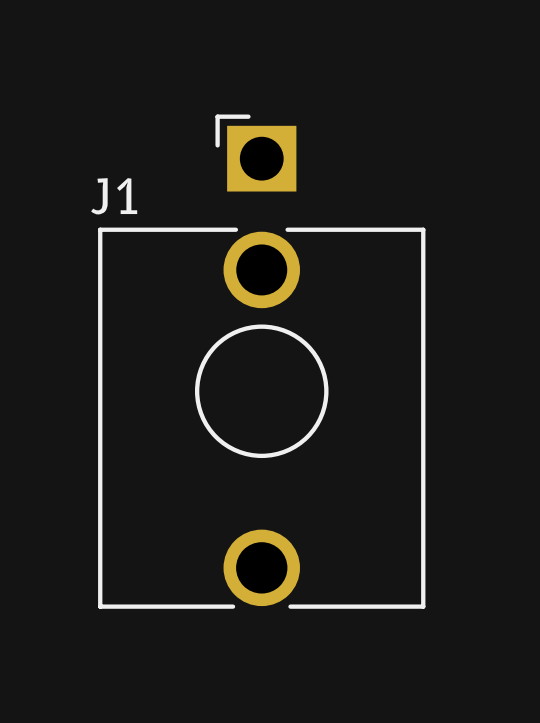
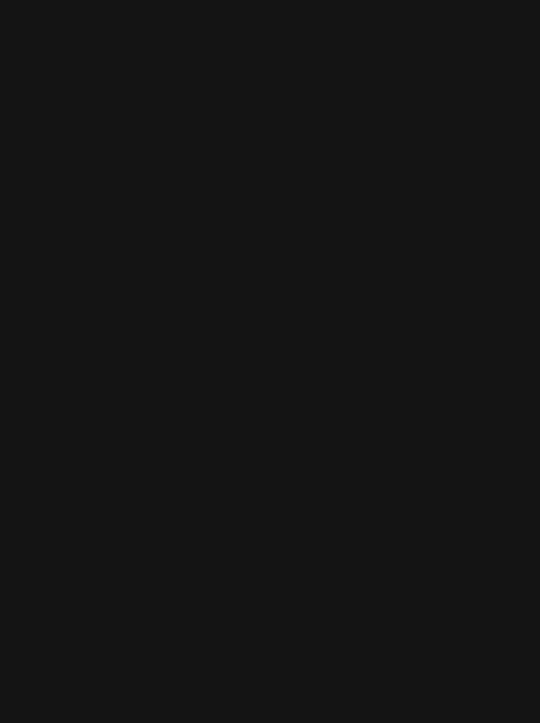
J1: (261, 361) -> none

